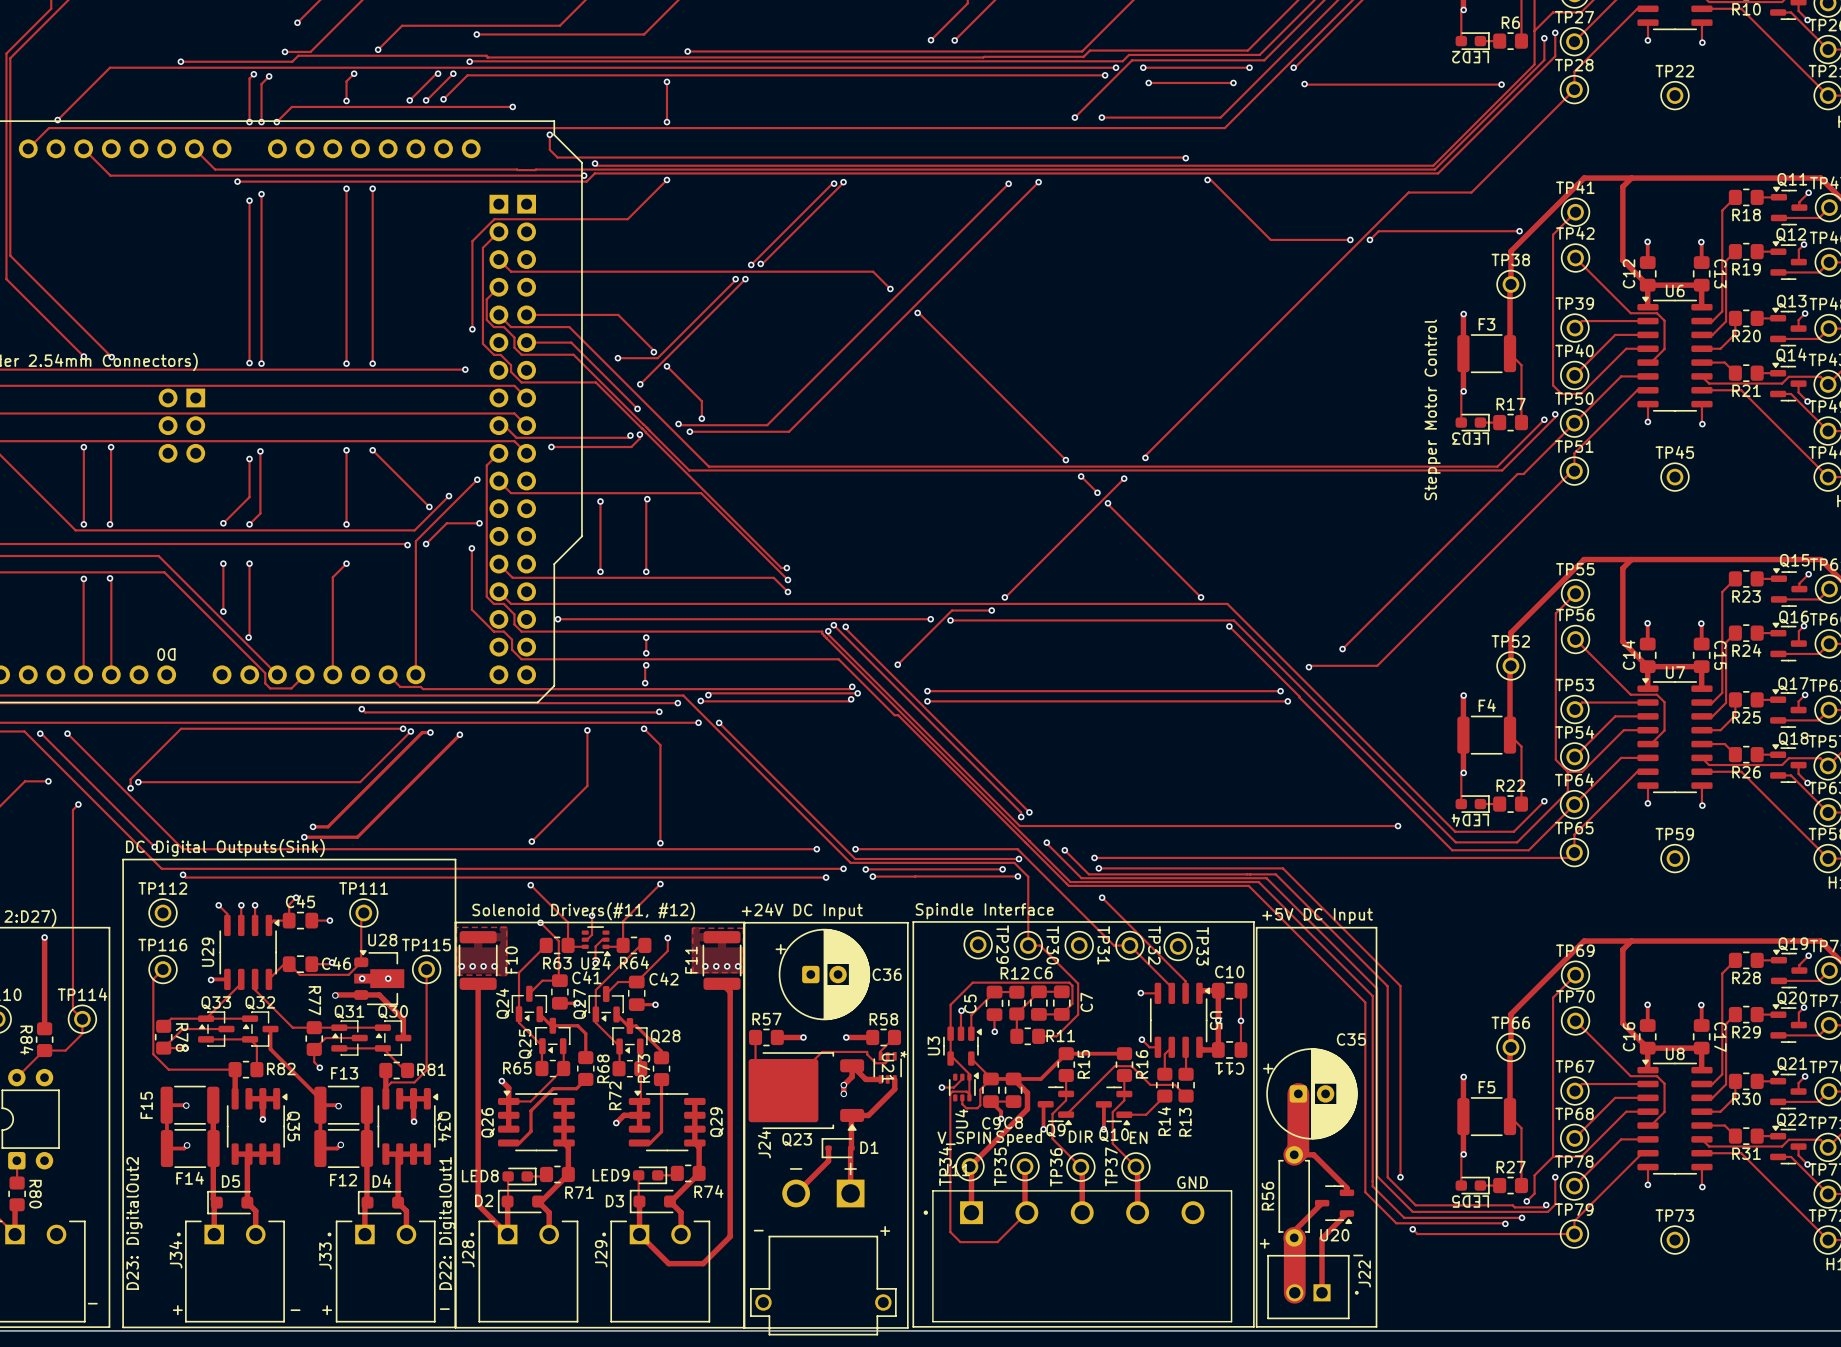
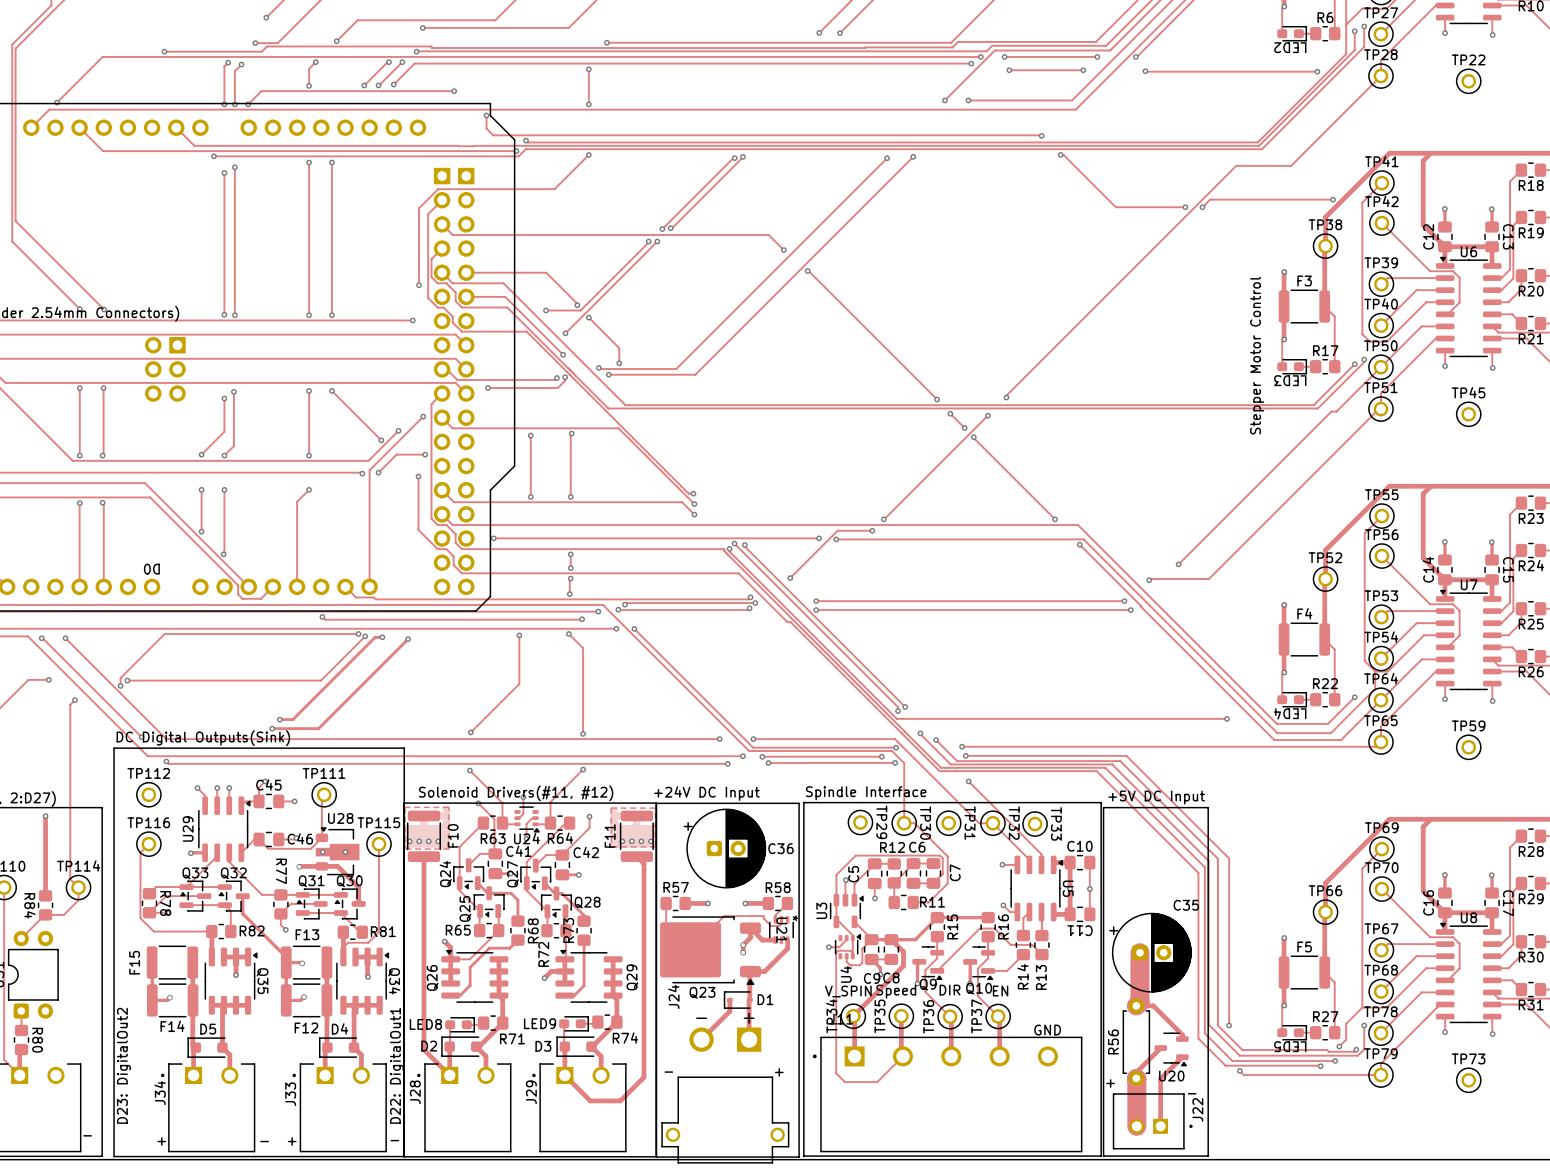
track: (166, 1105) (186, 1105) -> none
via: (186, 1105) -> none

